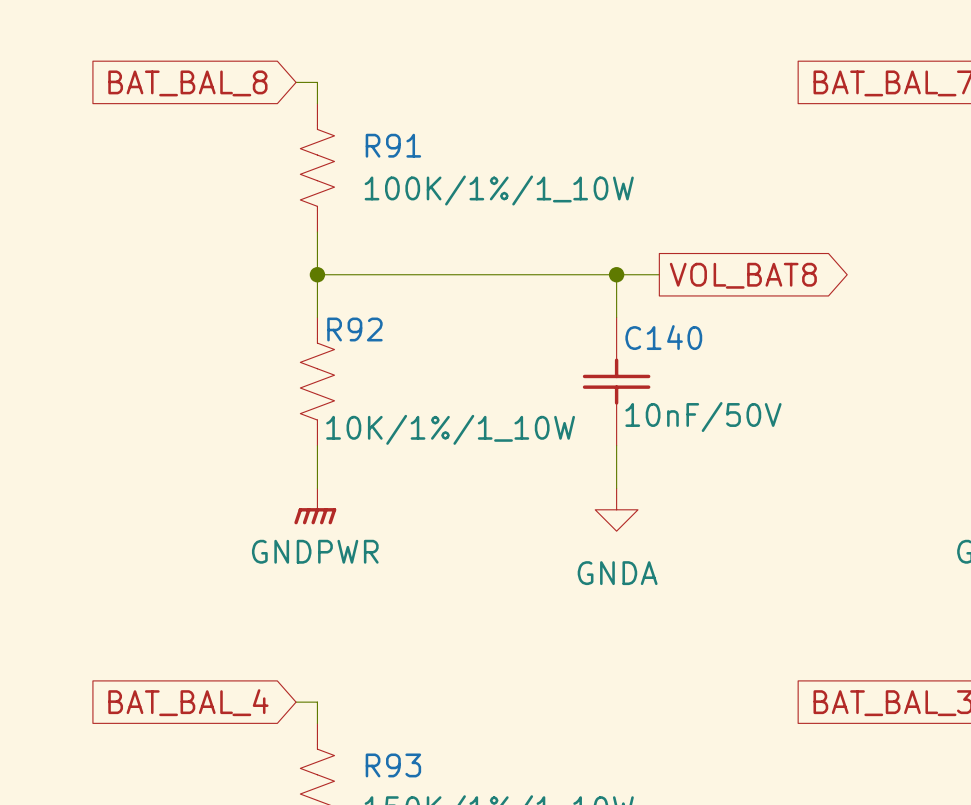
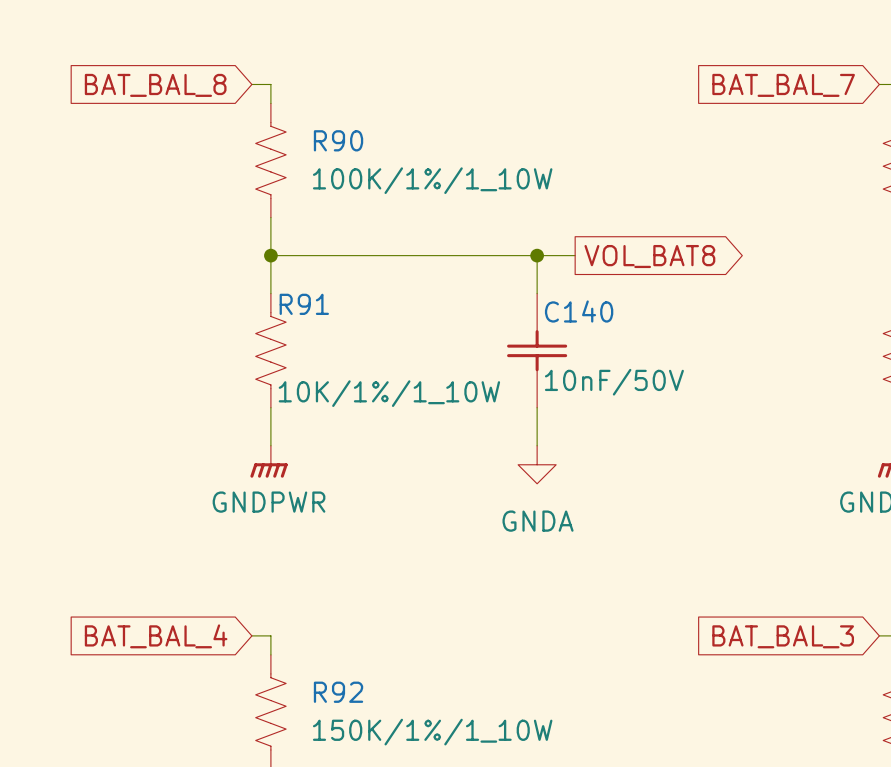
R91 name: R91 (393, 145) -> R90 (338, 140)
R92 name: R92 (354, 329) -> R91 (304, 304)
R93 name: R93 (393, 765) -> R92 (338, 692)

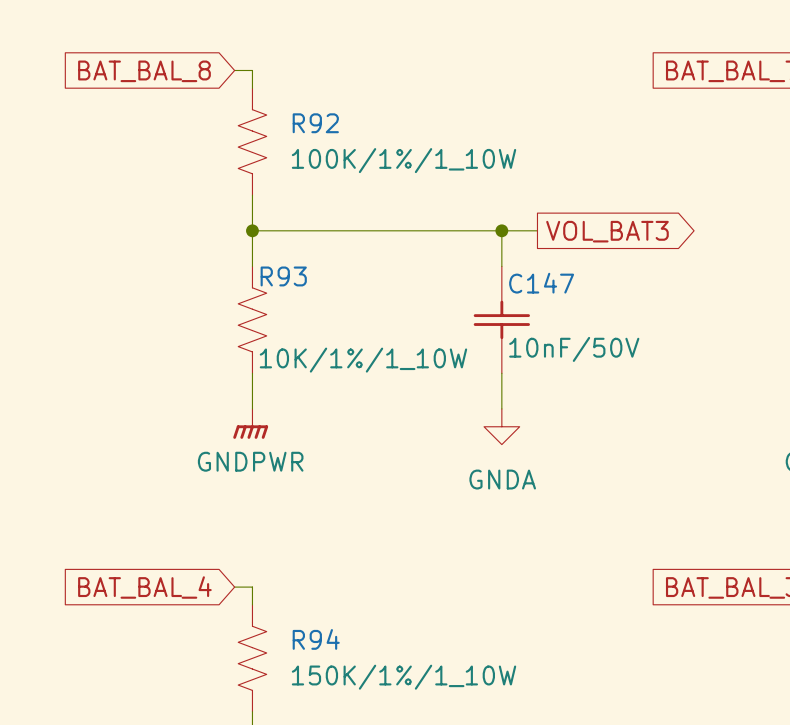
R90 name: R90 (338, 140) -> R92 (315, 123)
global label: VOL_BAT8 (649, 256) -> VOL_BAT3 (607, 231)
R91 name: R91 (304, 304) -> R93 (283, 276)
C140 name: C140 (579, 311) -> C147 (541, 283)
R92 name: R92 (338, 692) -> R94 (316, 639)

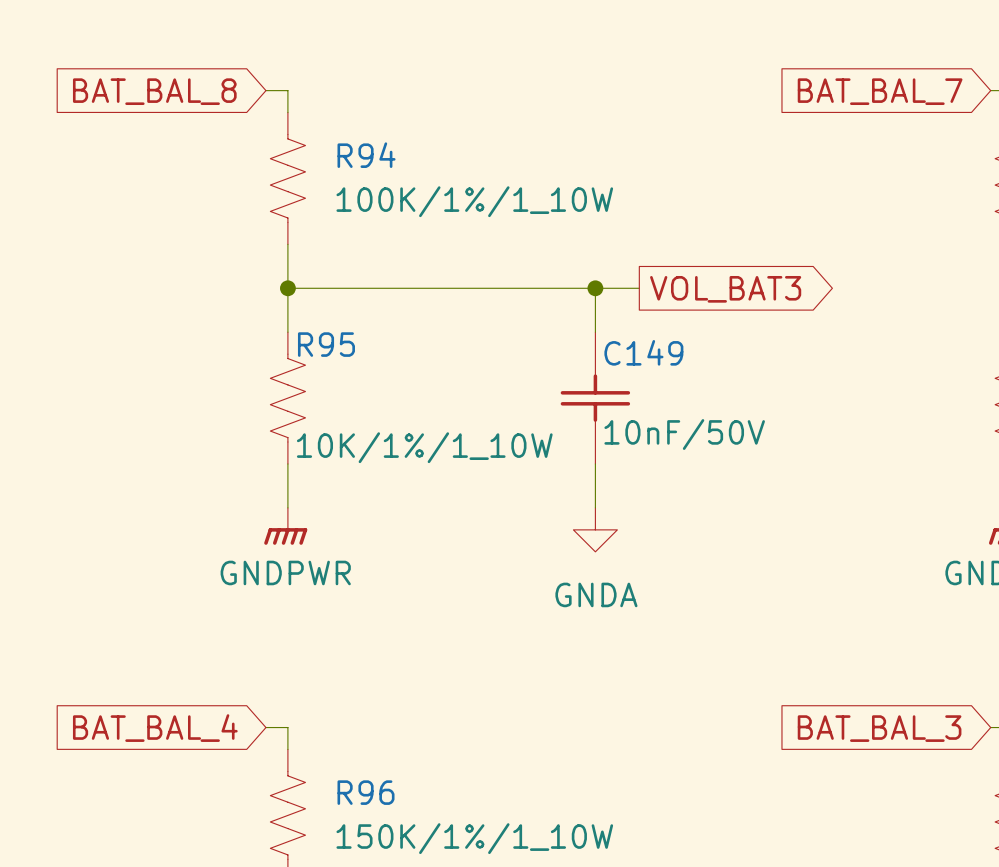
R92 name: R92 (315, 123) -> R94 (366, 155)
R93 name: R93 (283, 276) -> R95 (326, 344)
C147 name: C147 (541, 283) -> C149 (643, 352)
R94 name: R94 (316, 639) -> R96 (366, 792)

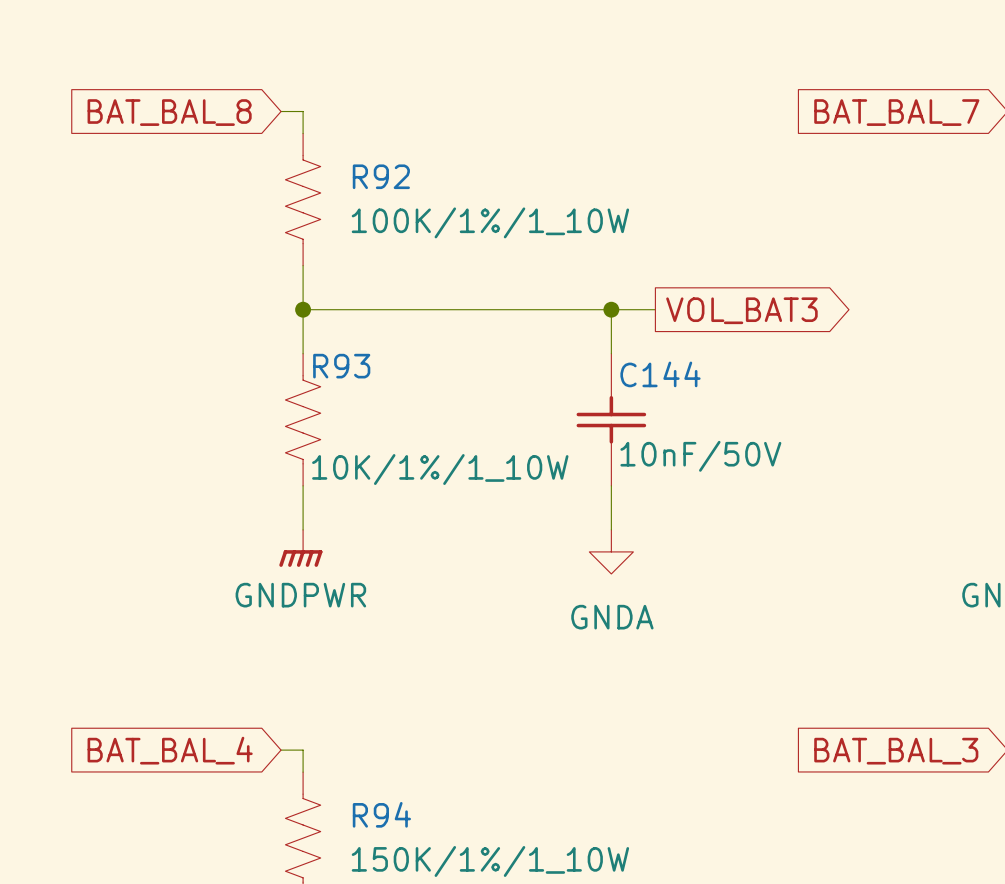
R94 name: R94 (366, 155) -> R92 (381, 176)
R95 name: R95 (326, 344) -> R93 (341, 366)
C149 name: C149 (643, 352) -> C144 (660, 374)
R96 name: R96 (366, 792) -> R94 (381, 814)

